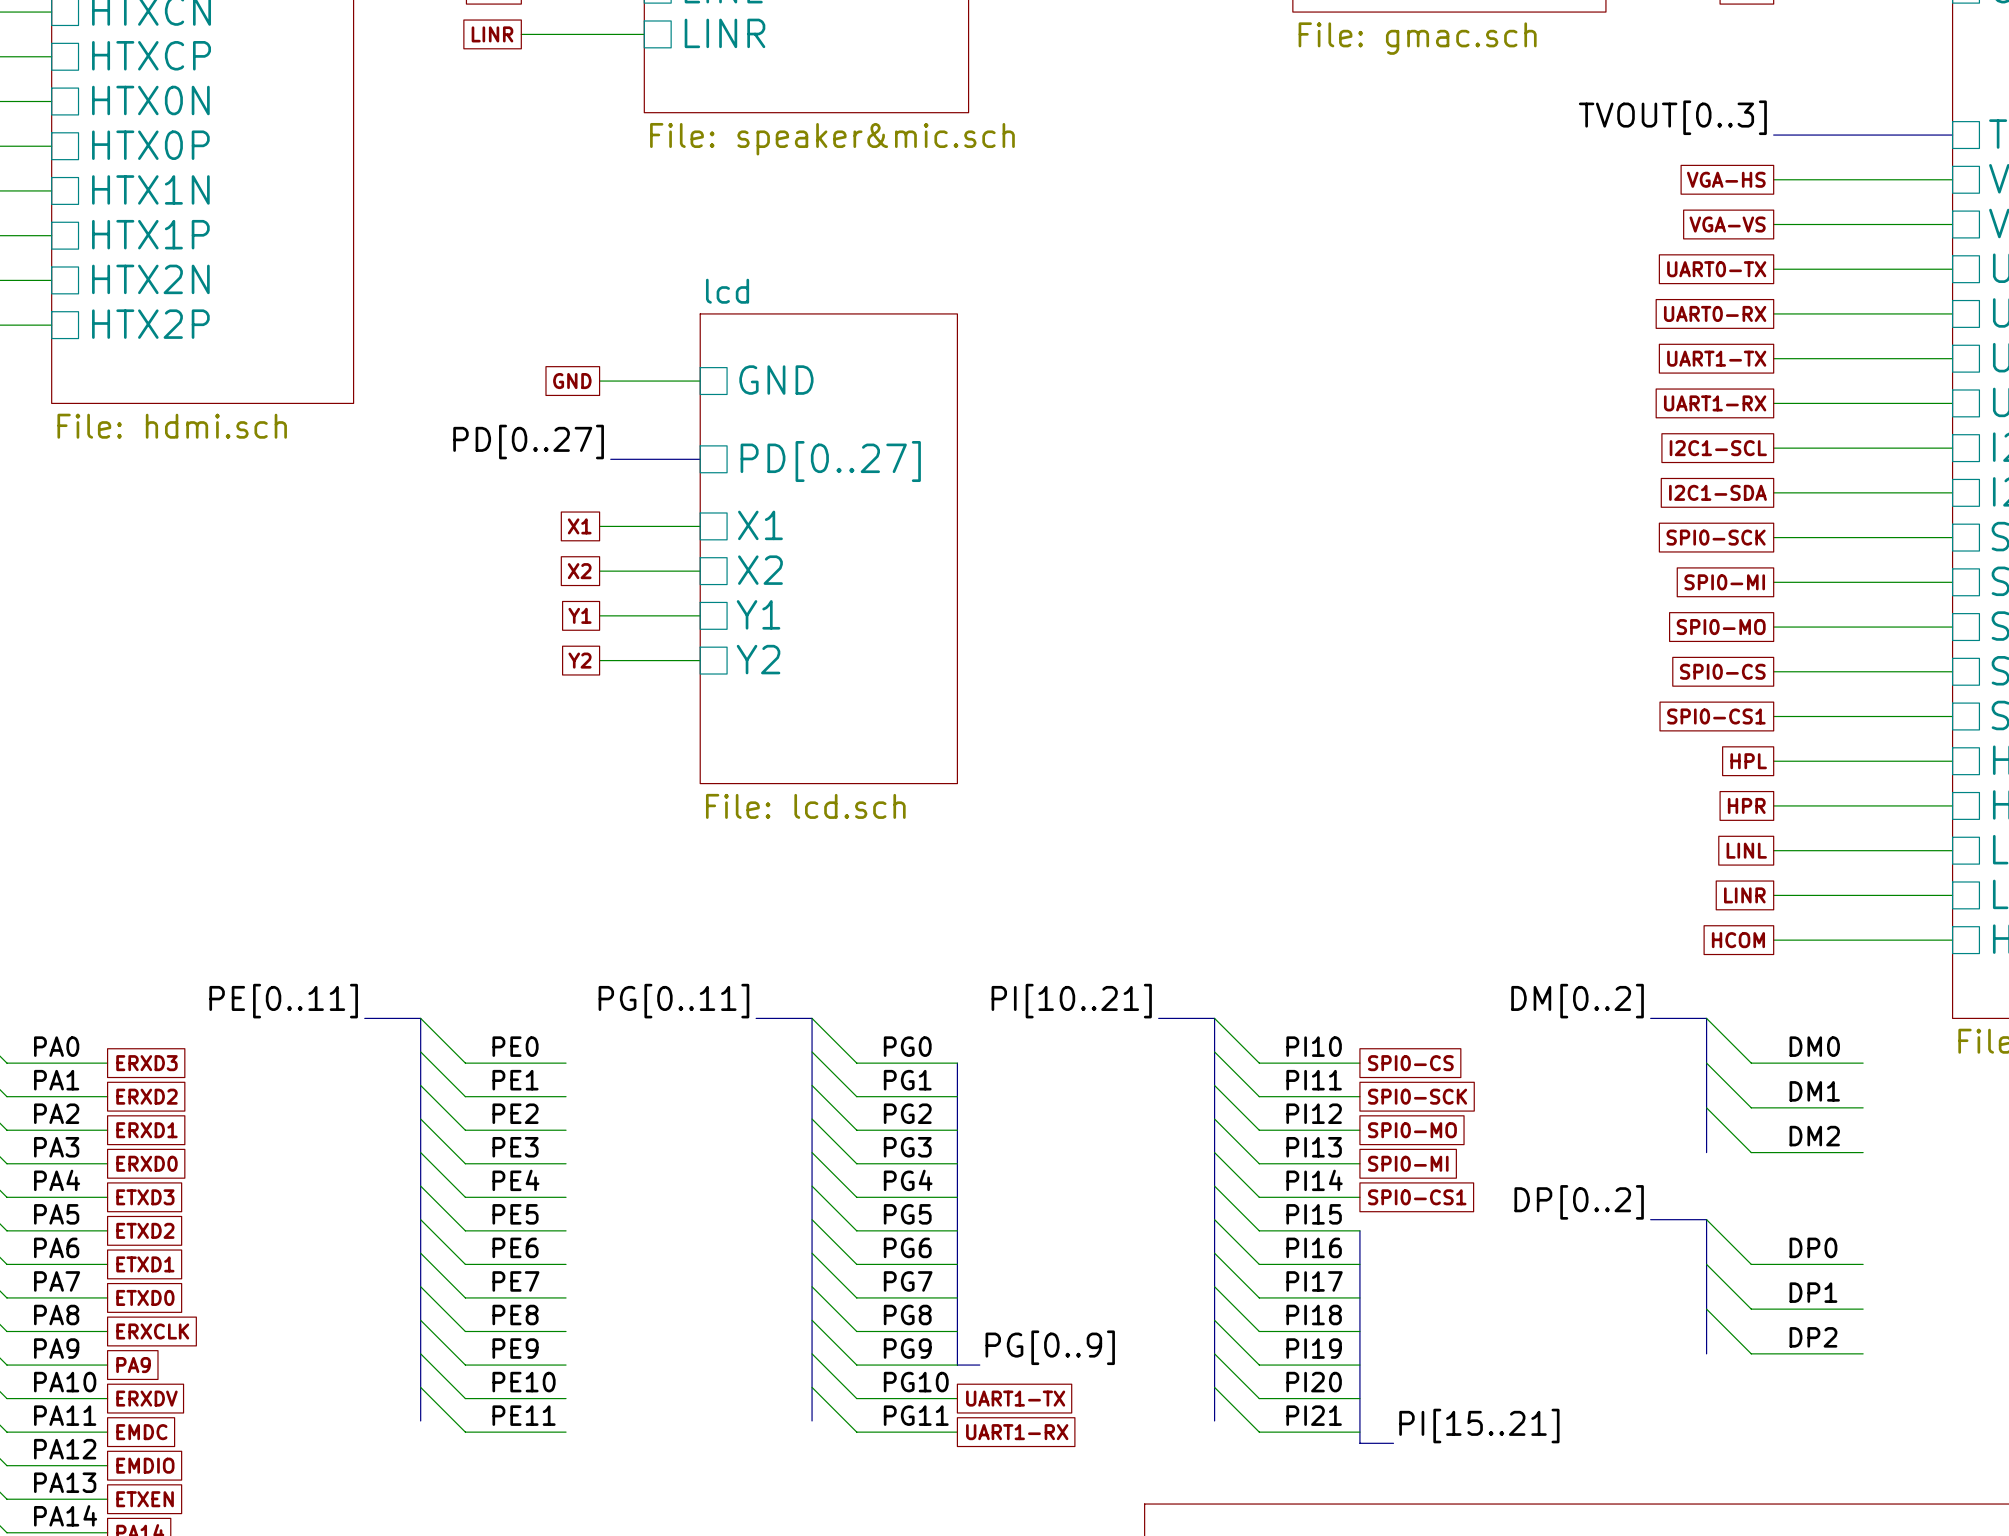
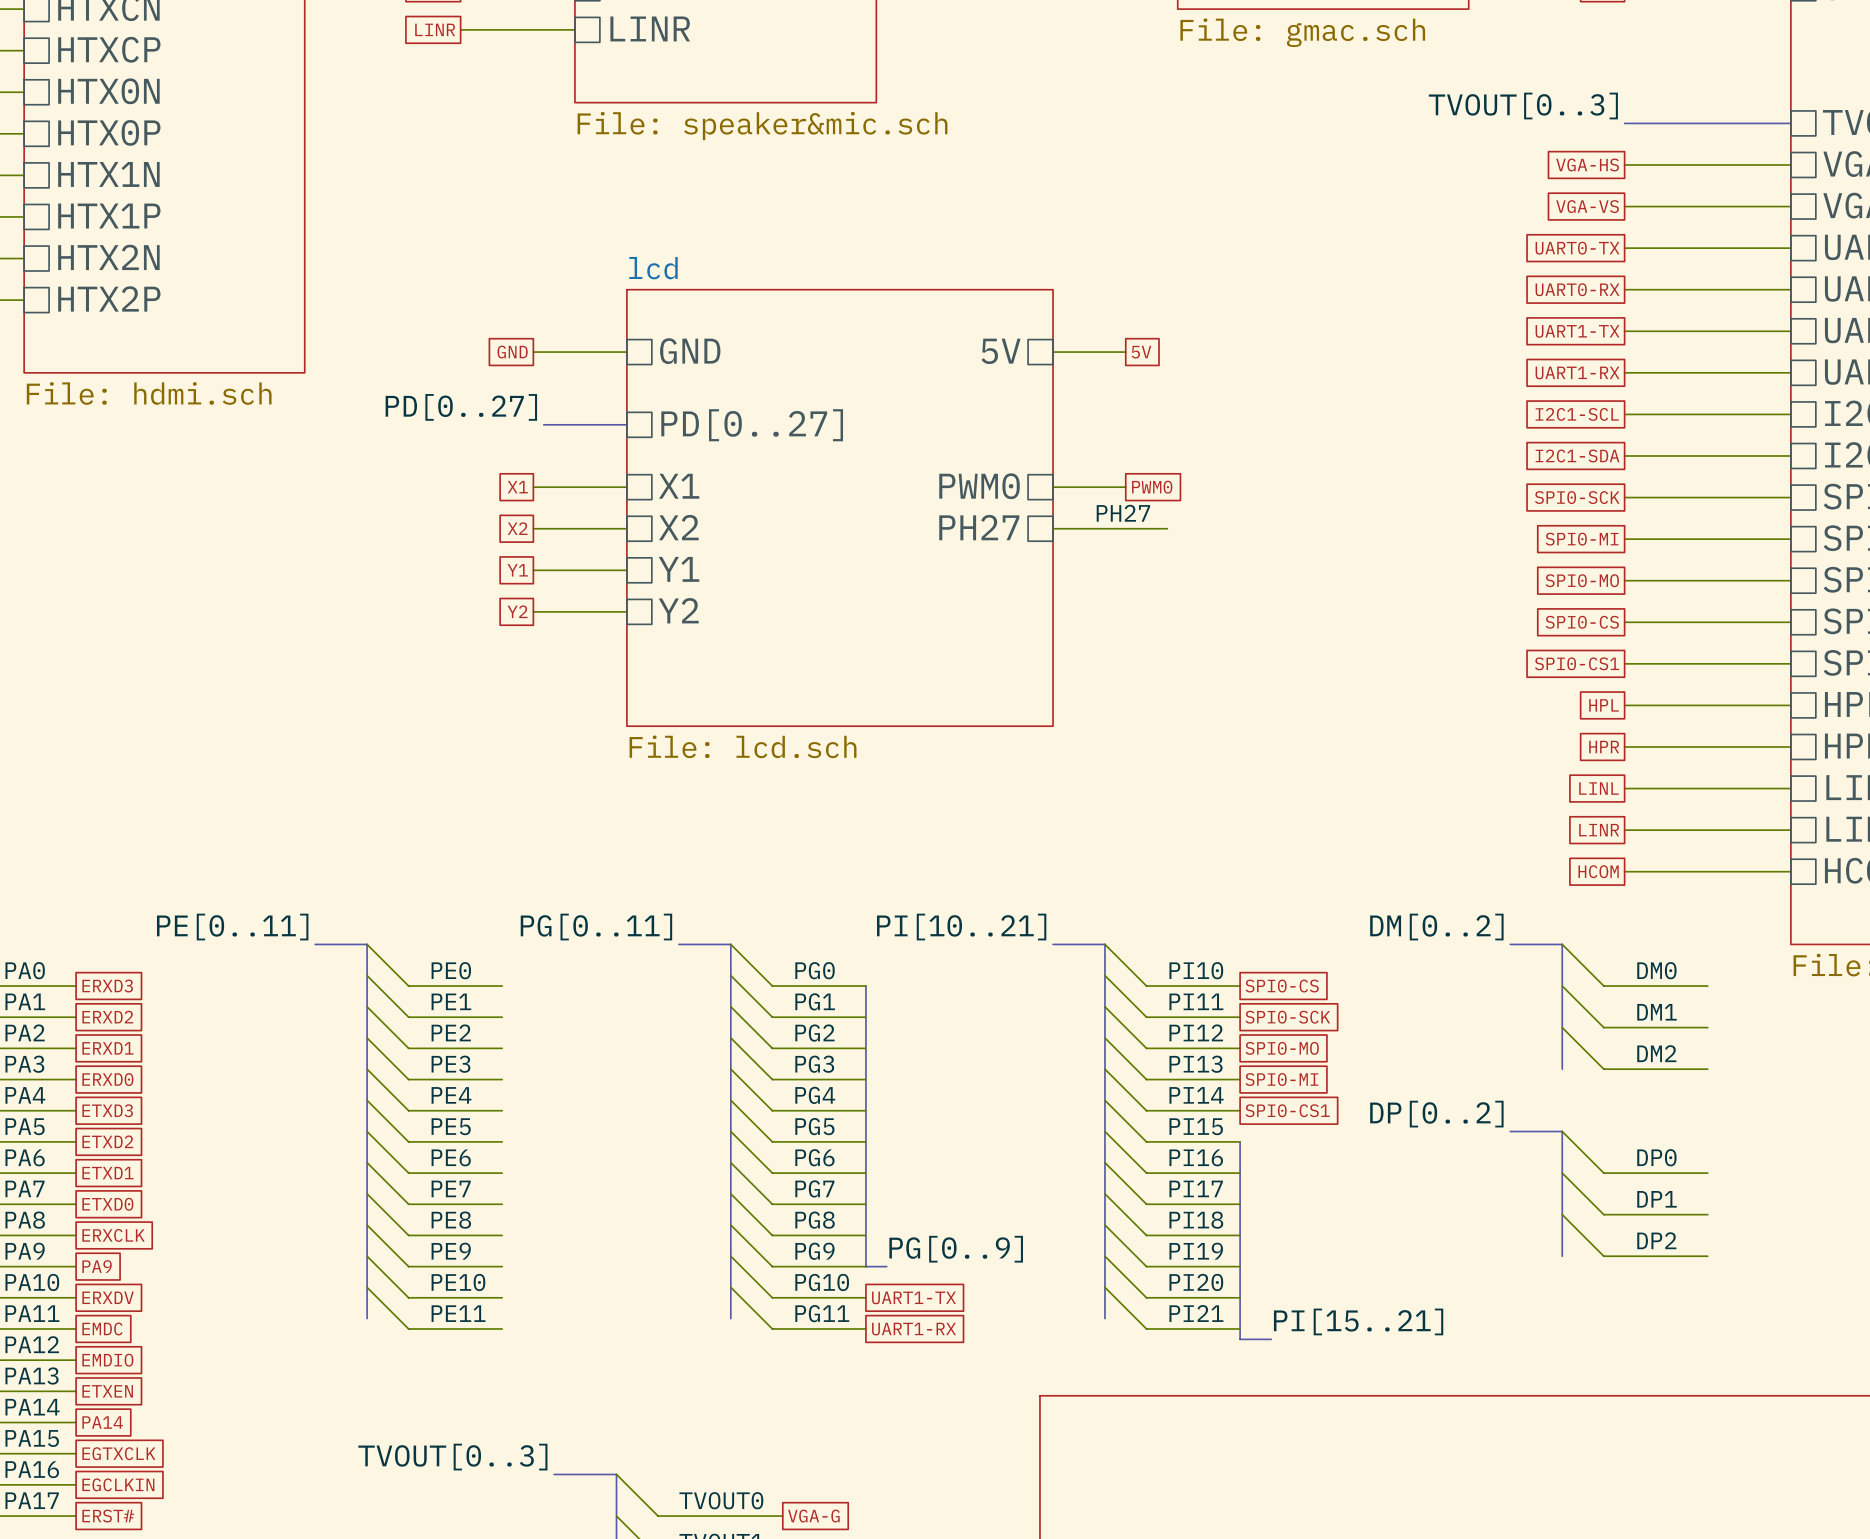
sheet pin: none -> 5V (1001, 351)
wire: none -> (1053, 352) (1125, 352)
global label: none -> 5V (1141, 352)
sheet pin: none -> PWM0 (979, 486)
wire: none -> (1053, 487) (1125, 487)
global label: none -> PWM0 (1152, 487)
sheet lcd: File: lcd.sch (828, 548) -> none
sheet lcd: none -> File: lcd.sch (839, 507)
label: none -> PH27 (1123, 513)
sheet pin: none -> PH27 (979, 527)
wire: none -> (1053, 528) (1167, 528)

